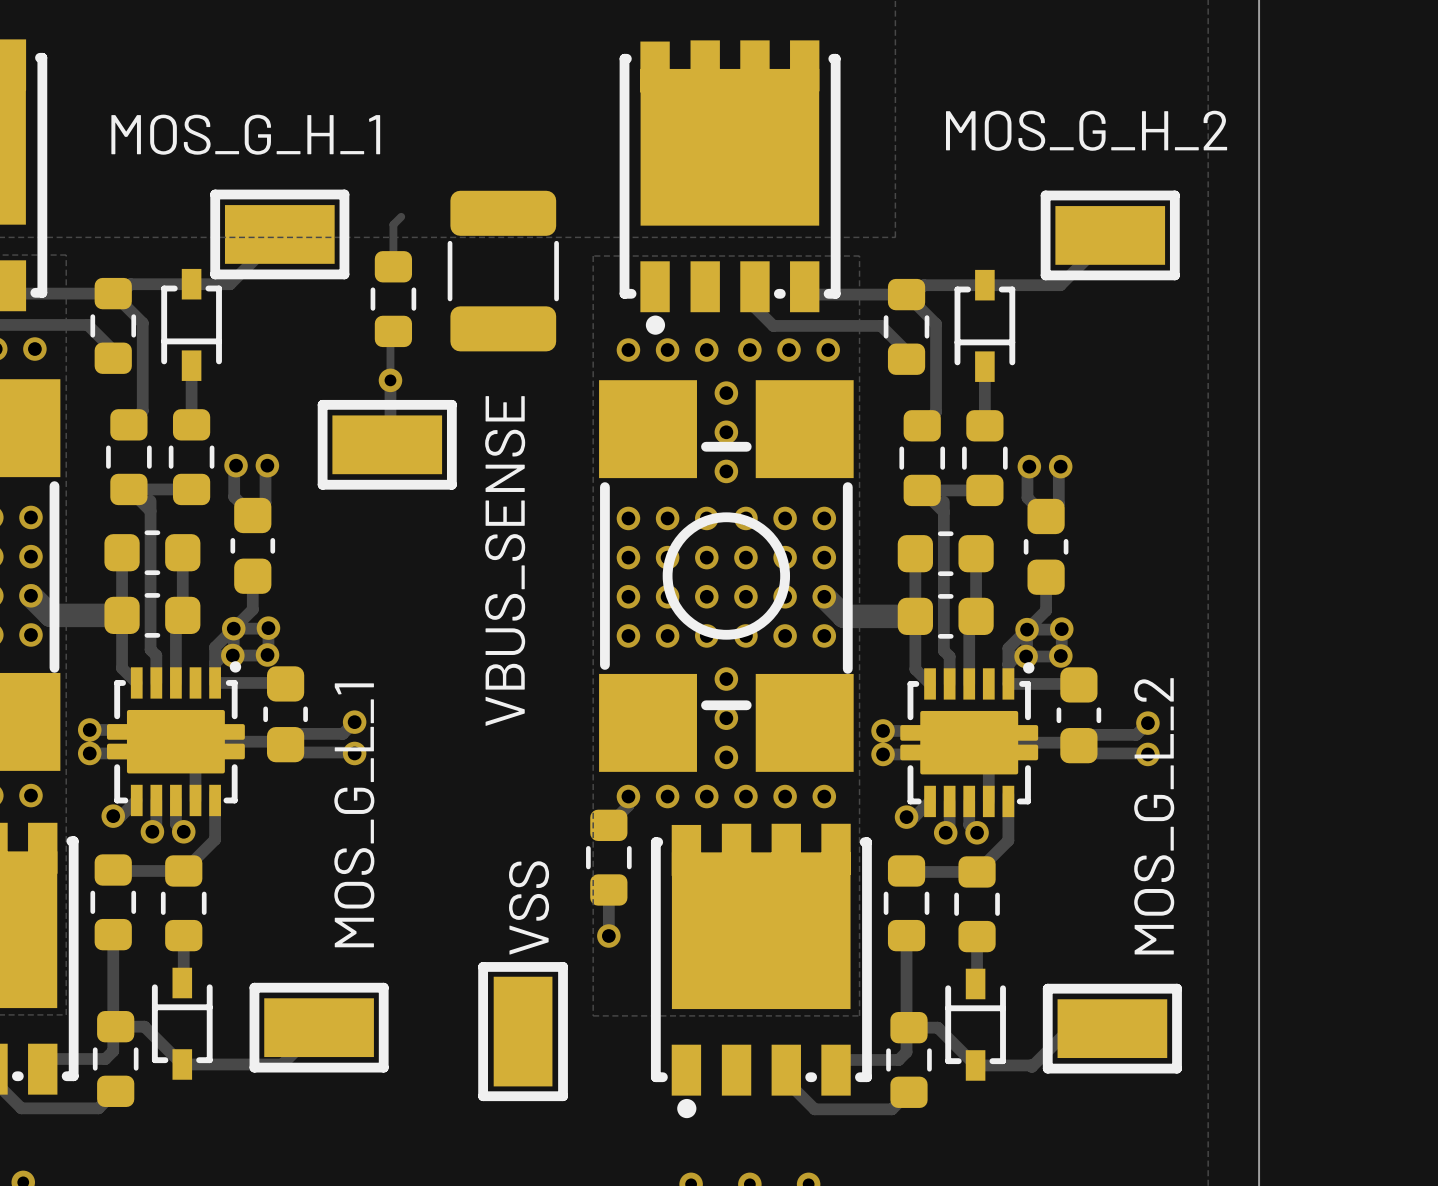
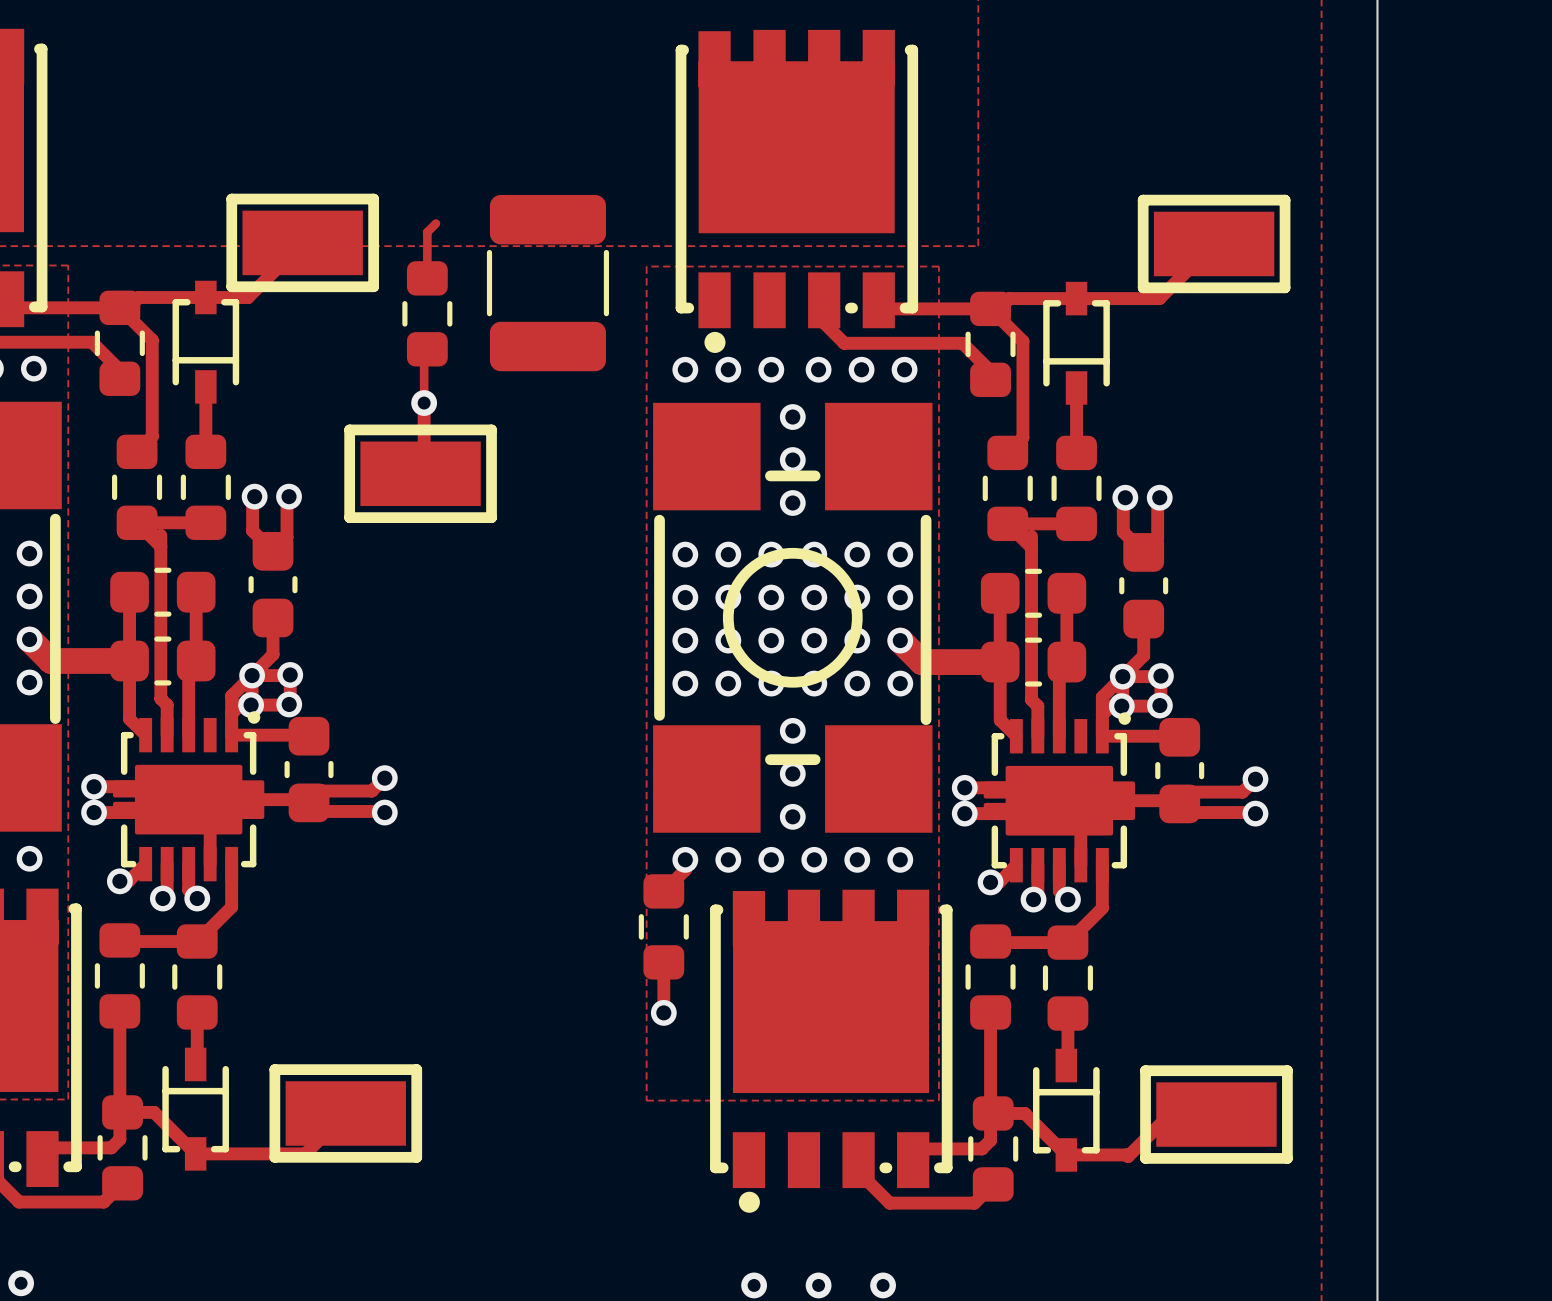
part value: MOS_G_H_2 (1086, 130) -> none
part value: MOS_G_H_1 (245, 134) -> none
part value: VBUS_SENSE (505, 561) -> none
part value: MOS_G_L_1 (354, 815) -> none
part value: MOS_G_L_2 (1154, 816) -> none
part: VSS (523, 1031) -> none

